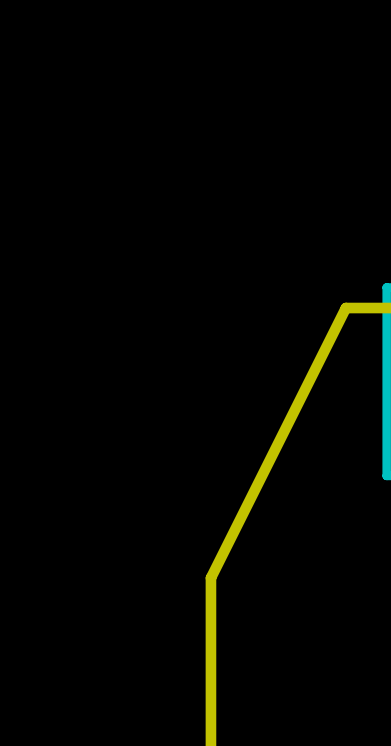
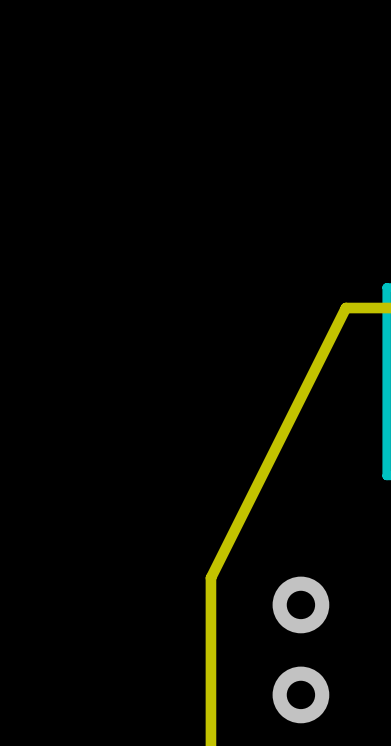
via: none -> (300, 604)
via: none -> (300, 694)

